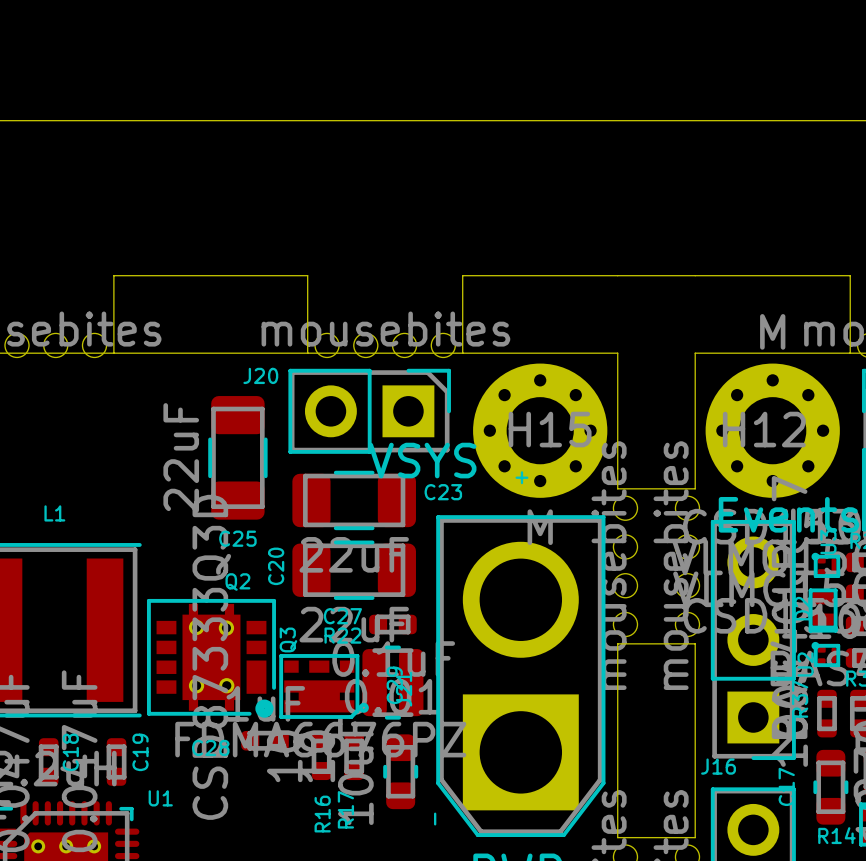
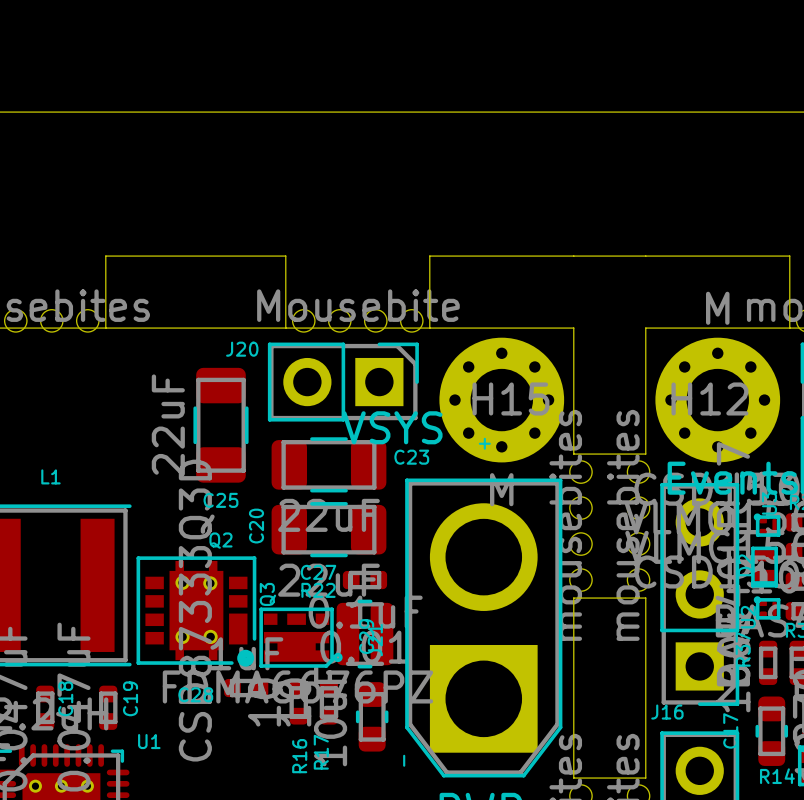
part value: mousebites (385, 329) -> Mousebite (358, 305)

